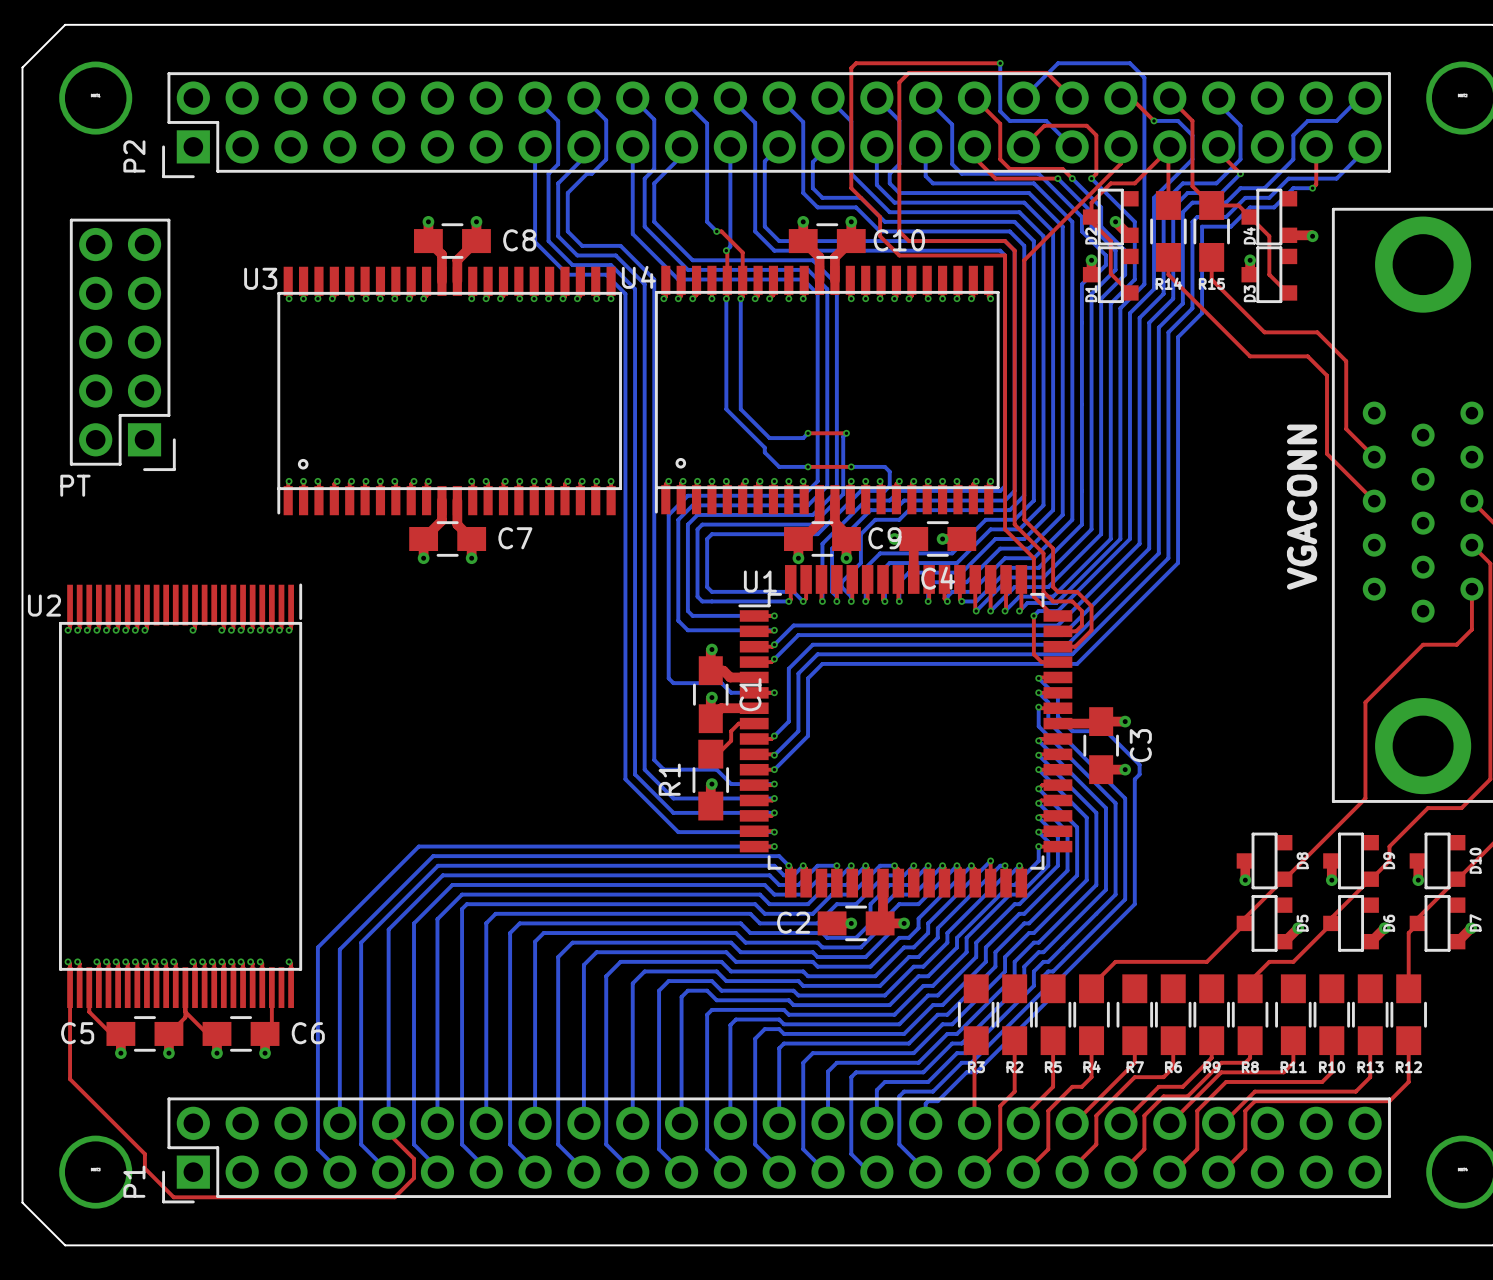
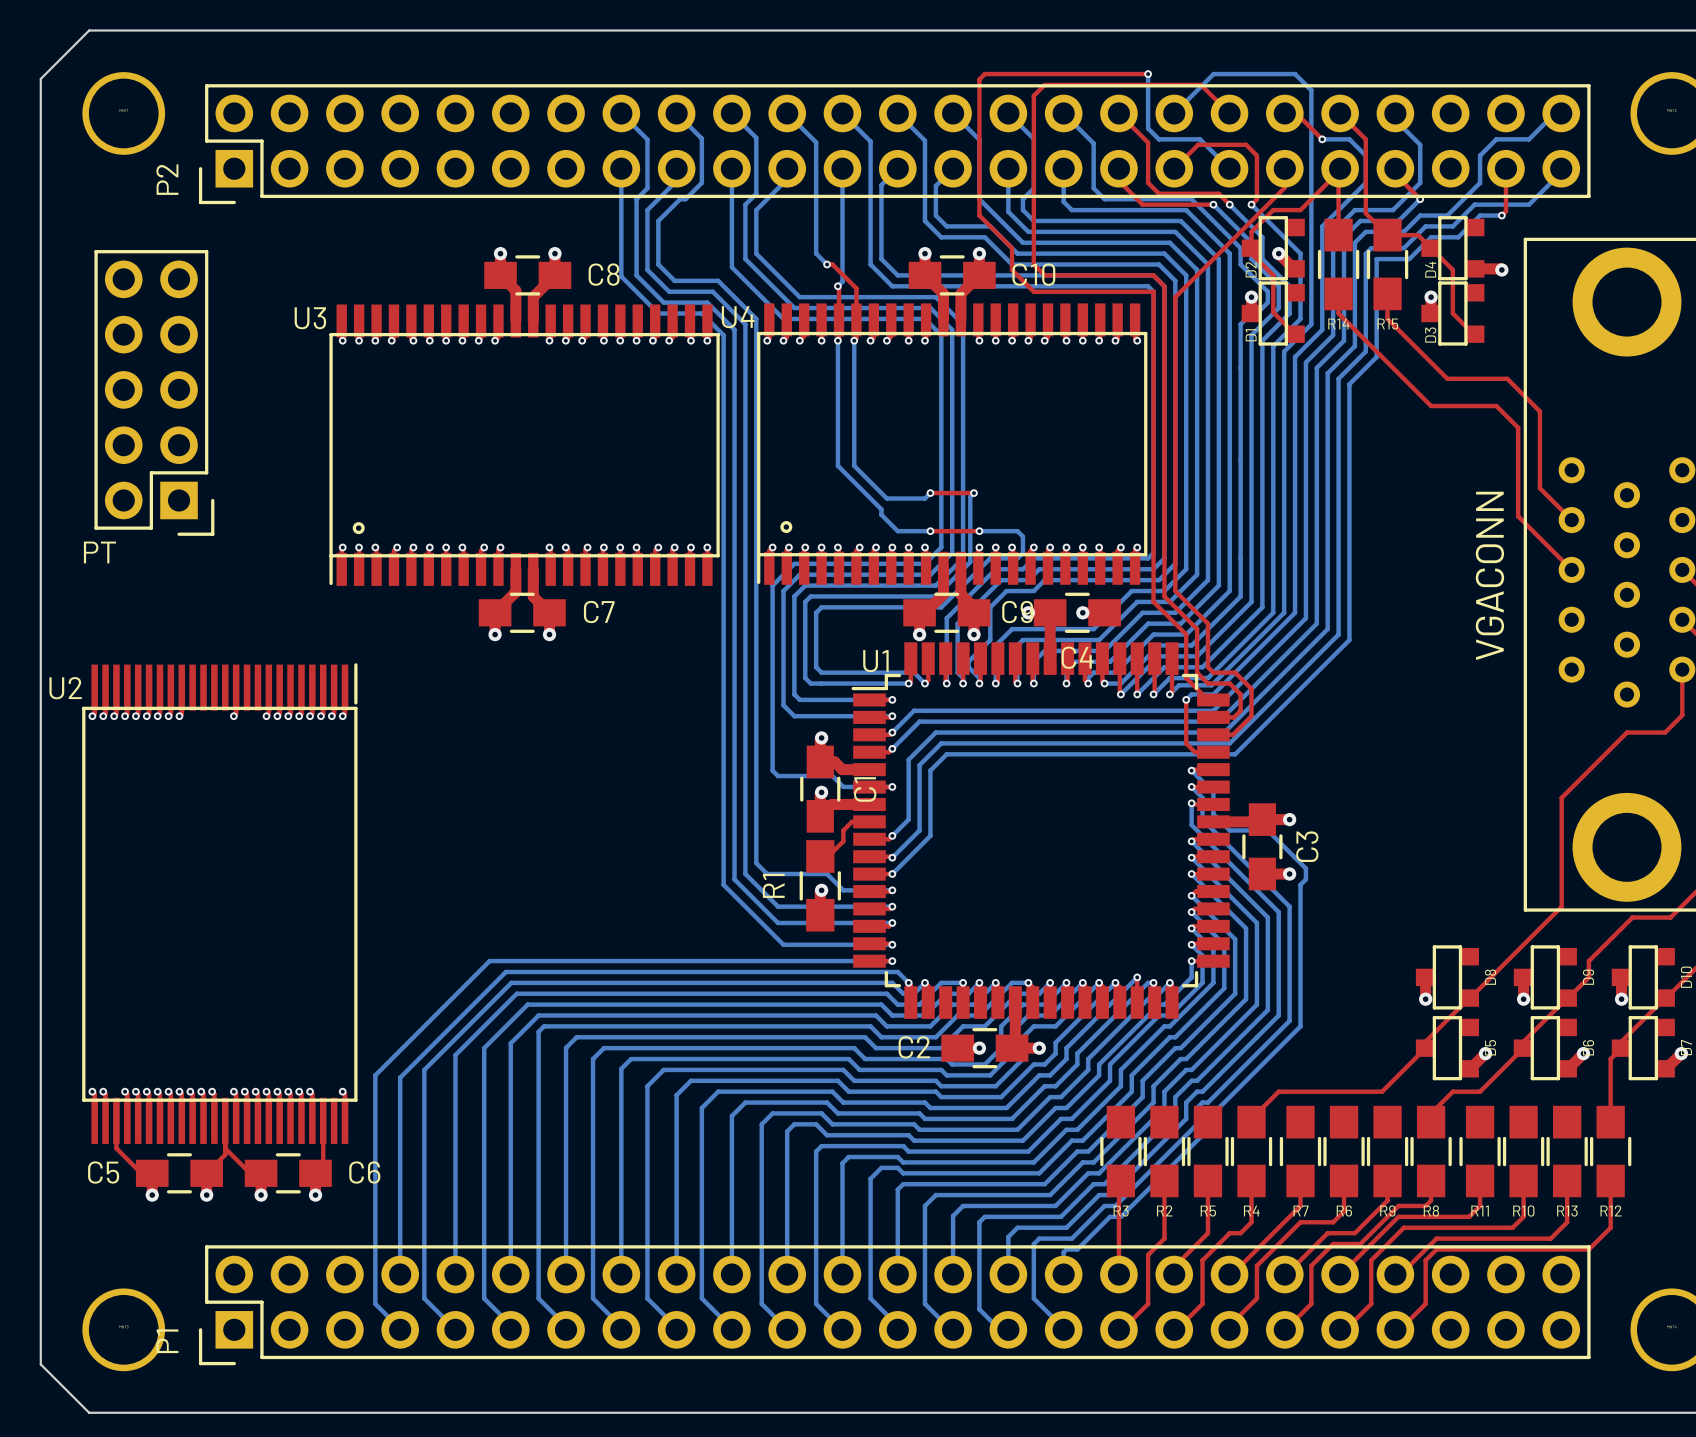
top track: (70, 987) (70, 1079) (144, 1154) (144, 1168) (173, 1197) (394, 1197) (414, 1178) (414, 1158) (388, 1133) (388, 1123) -> none

